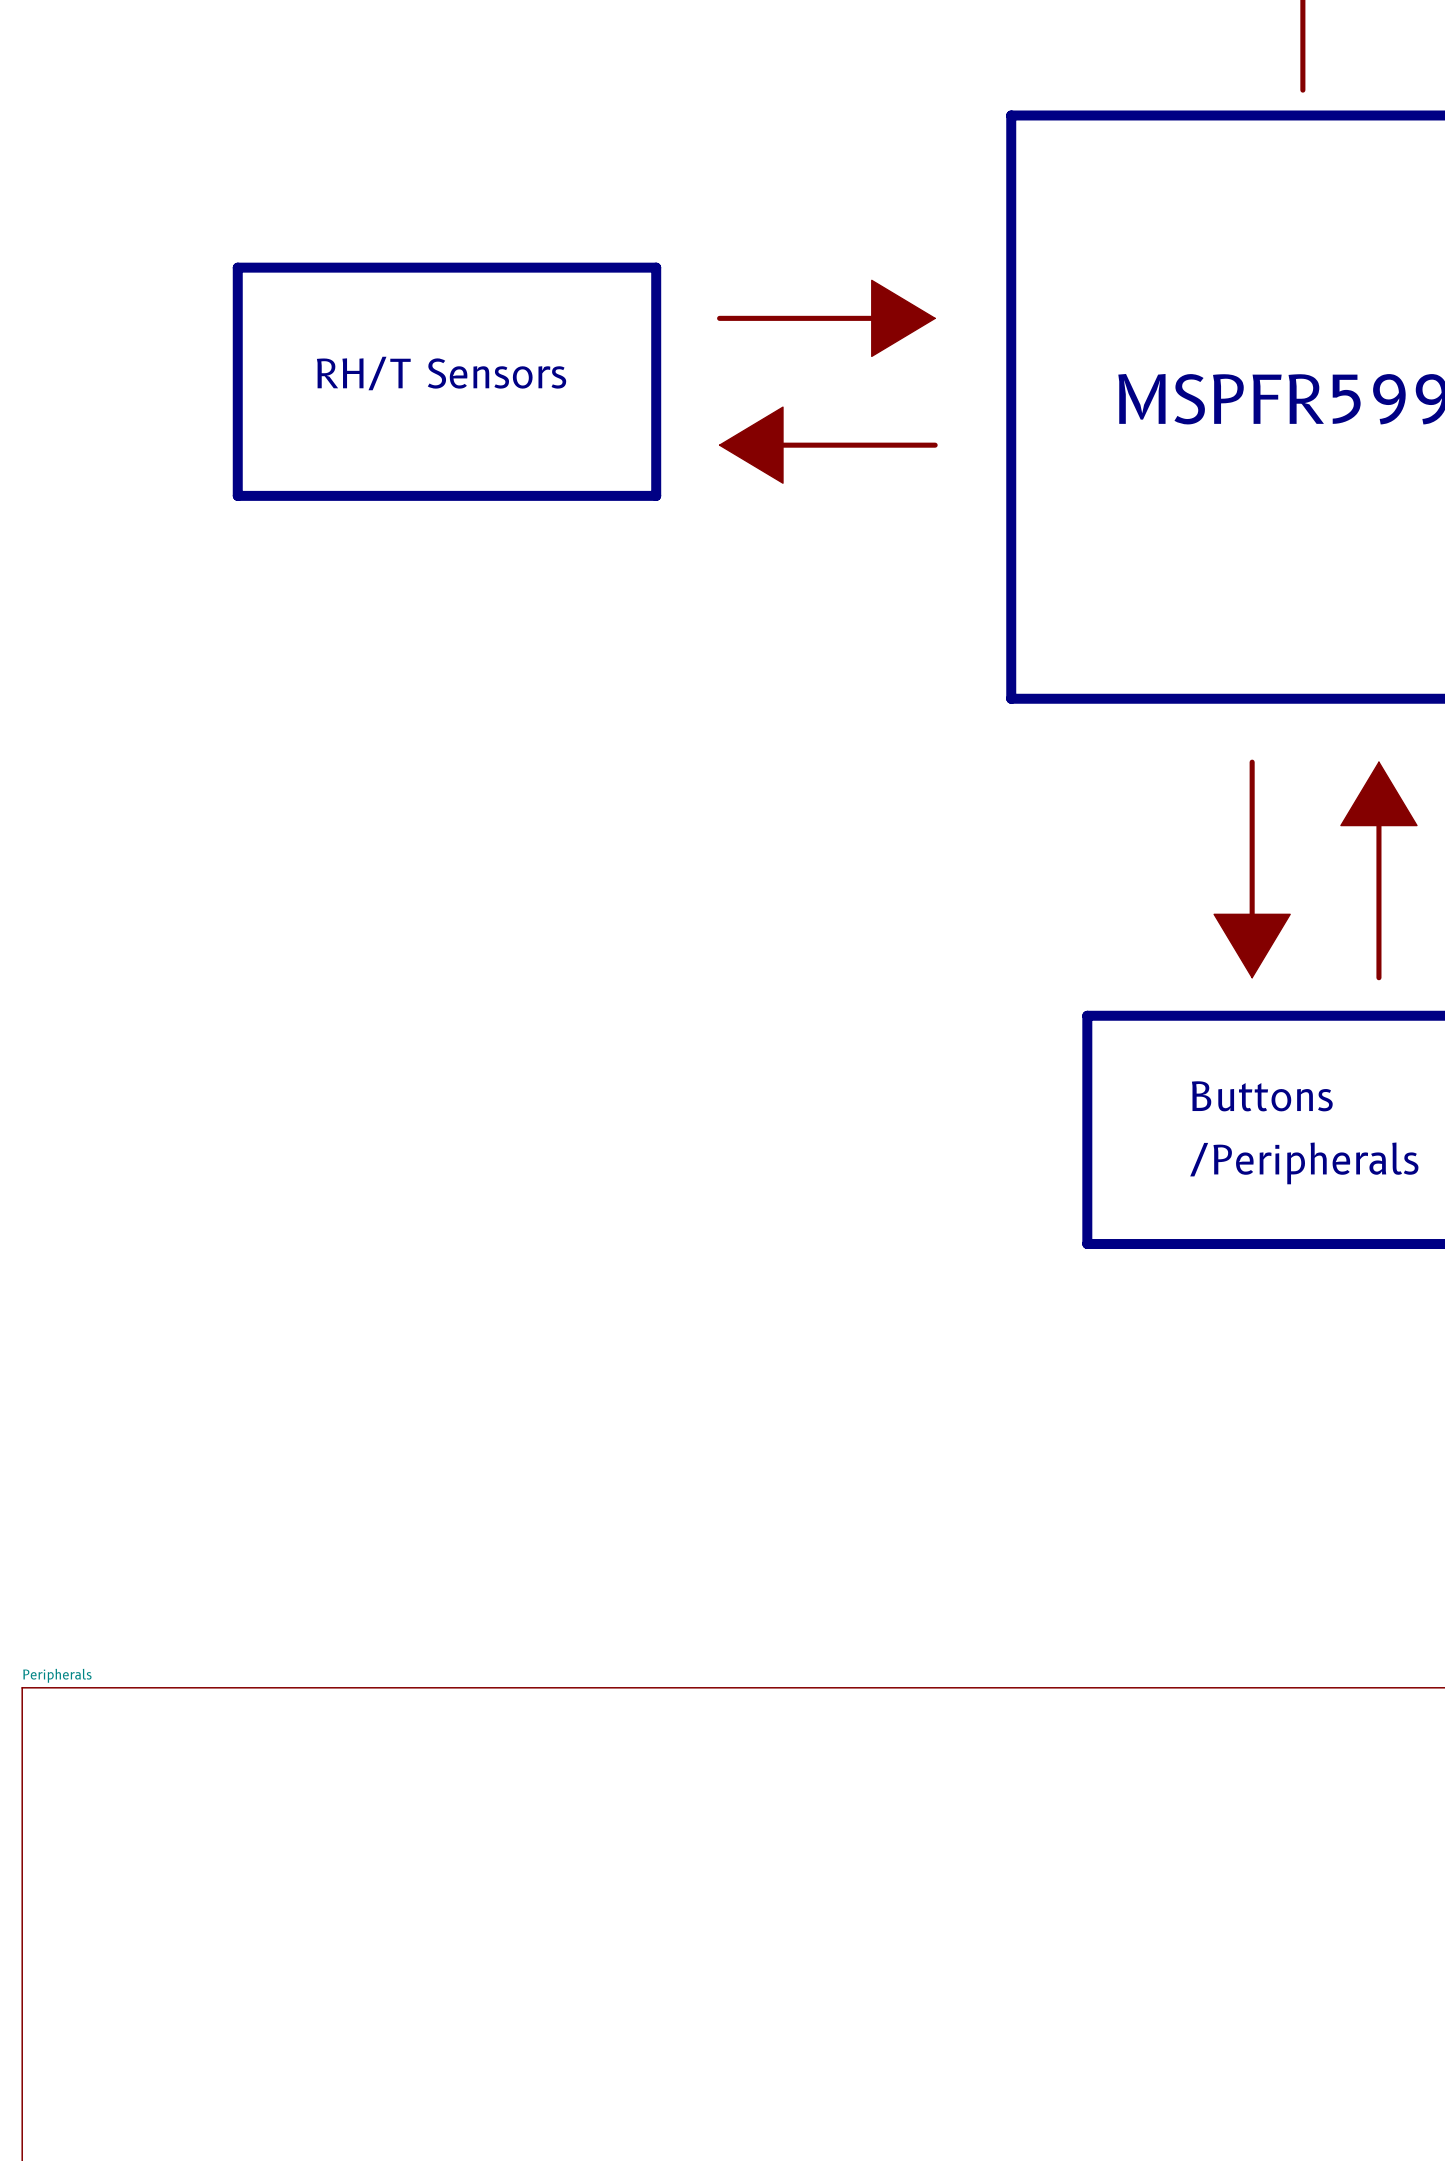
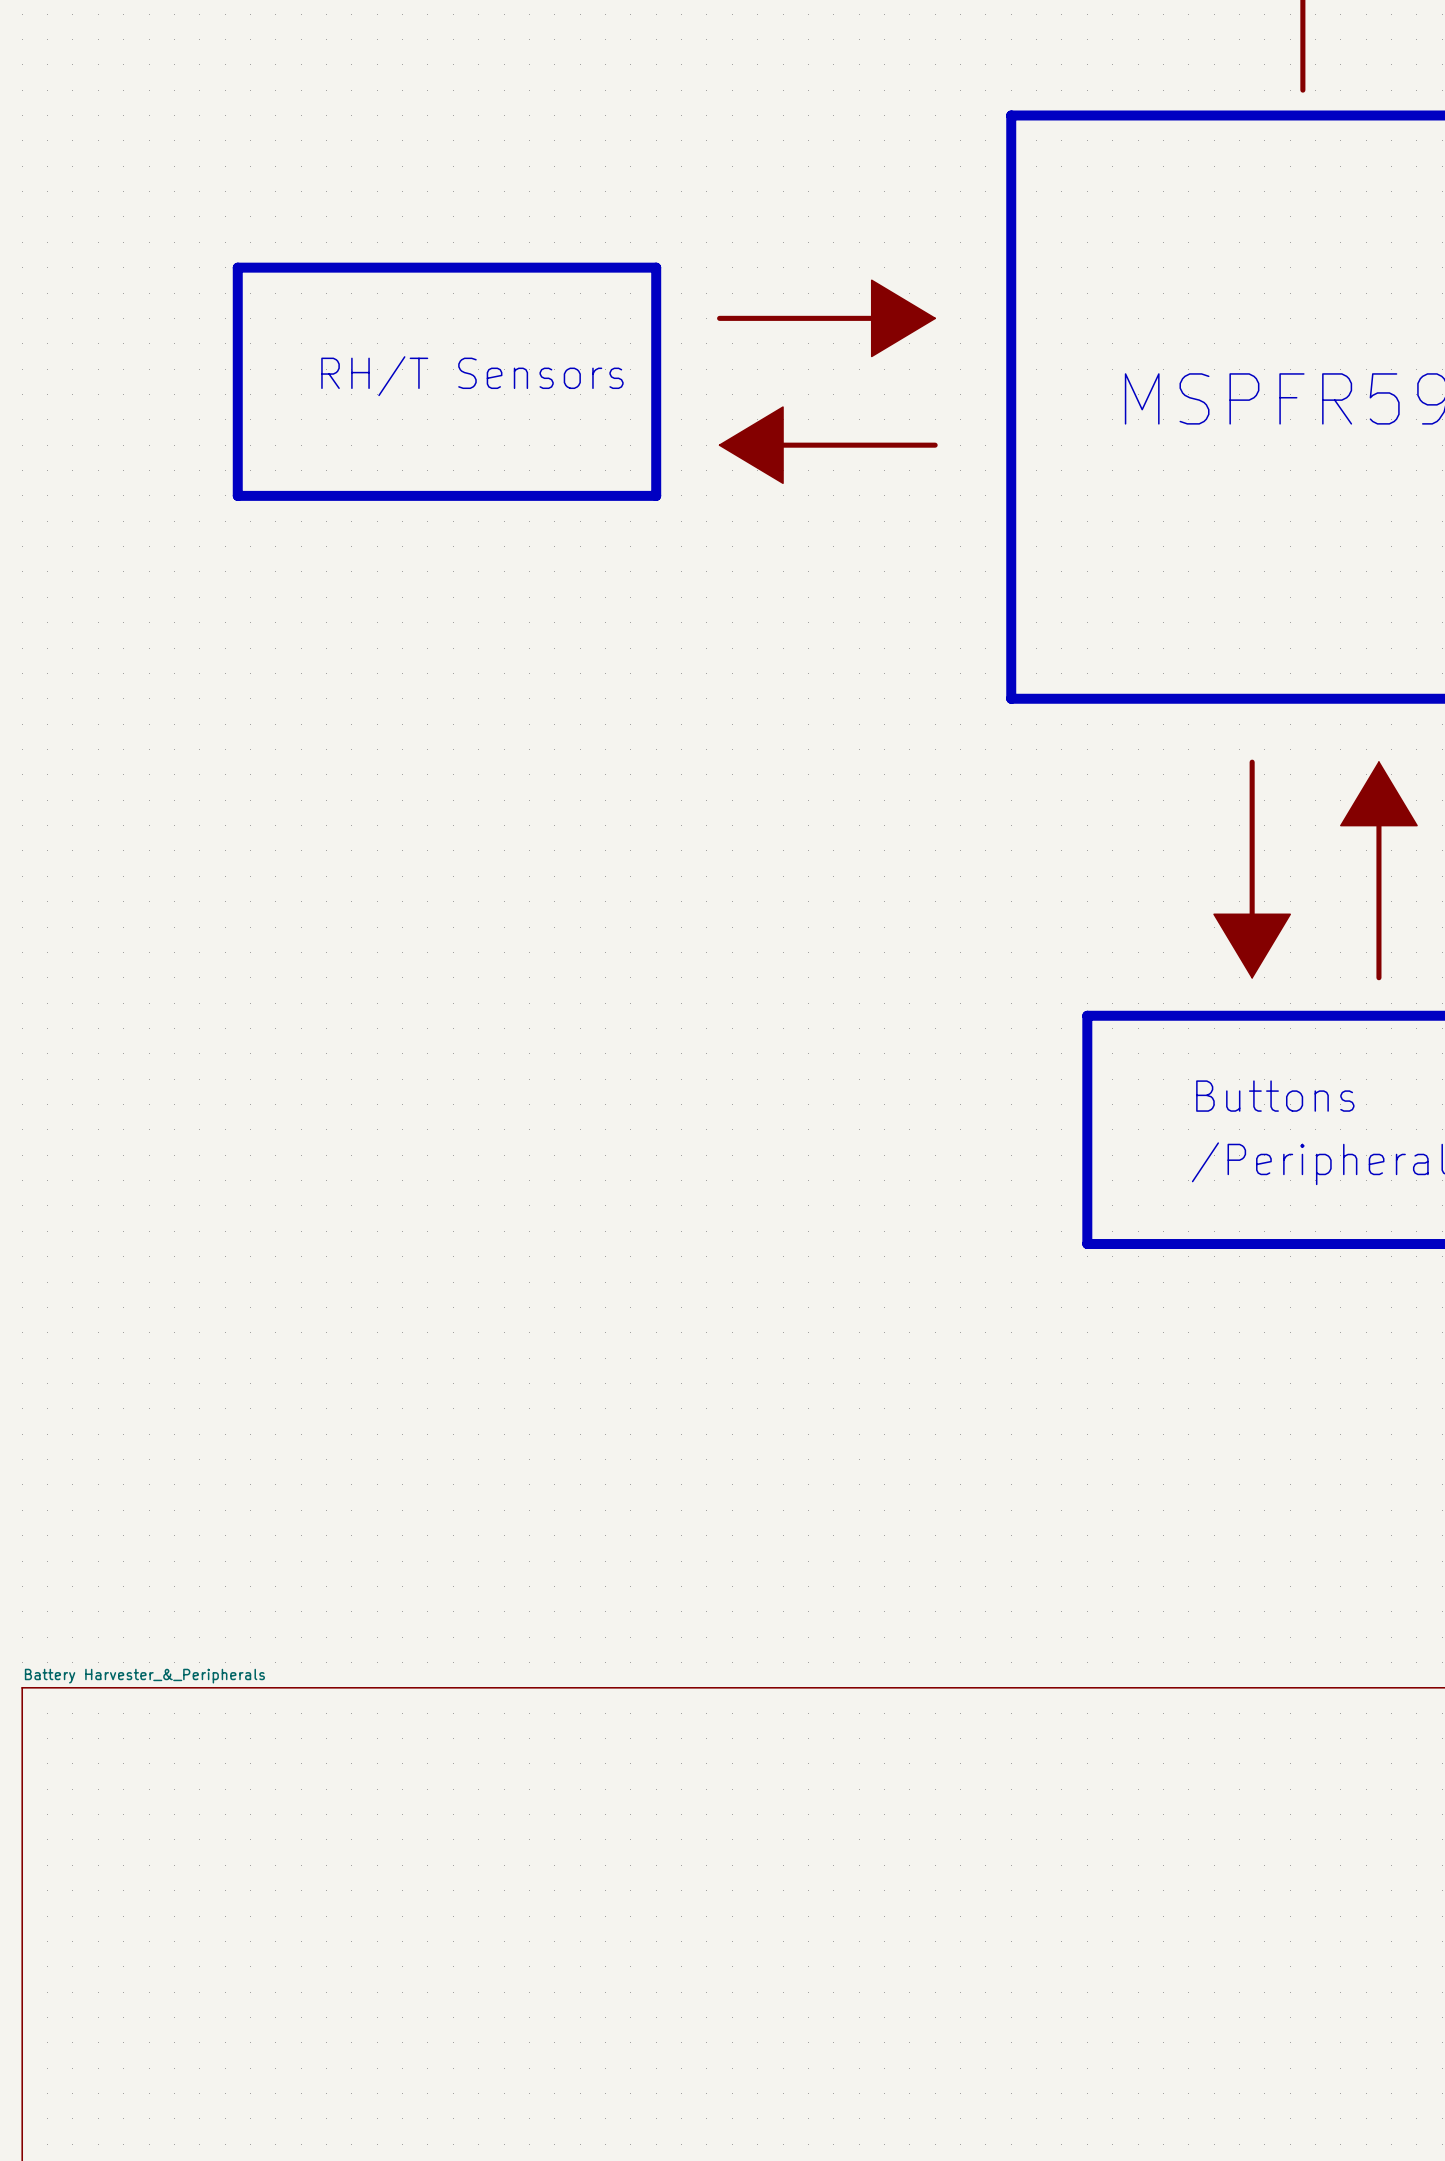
sheet Peripherals name: Peripherals (57, 1675) -> Battery Harvester_&_Peripherals (144, 1676)

